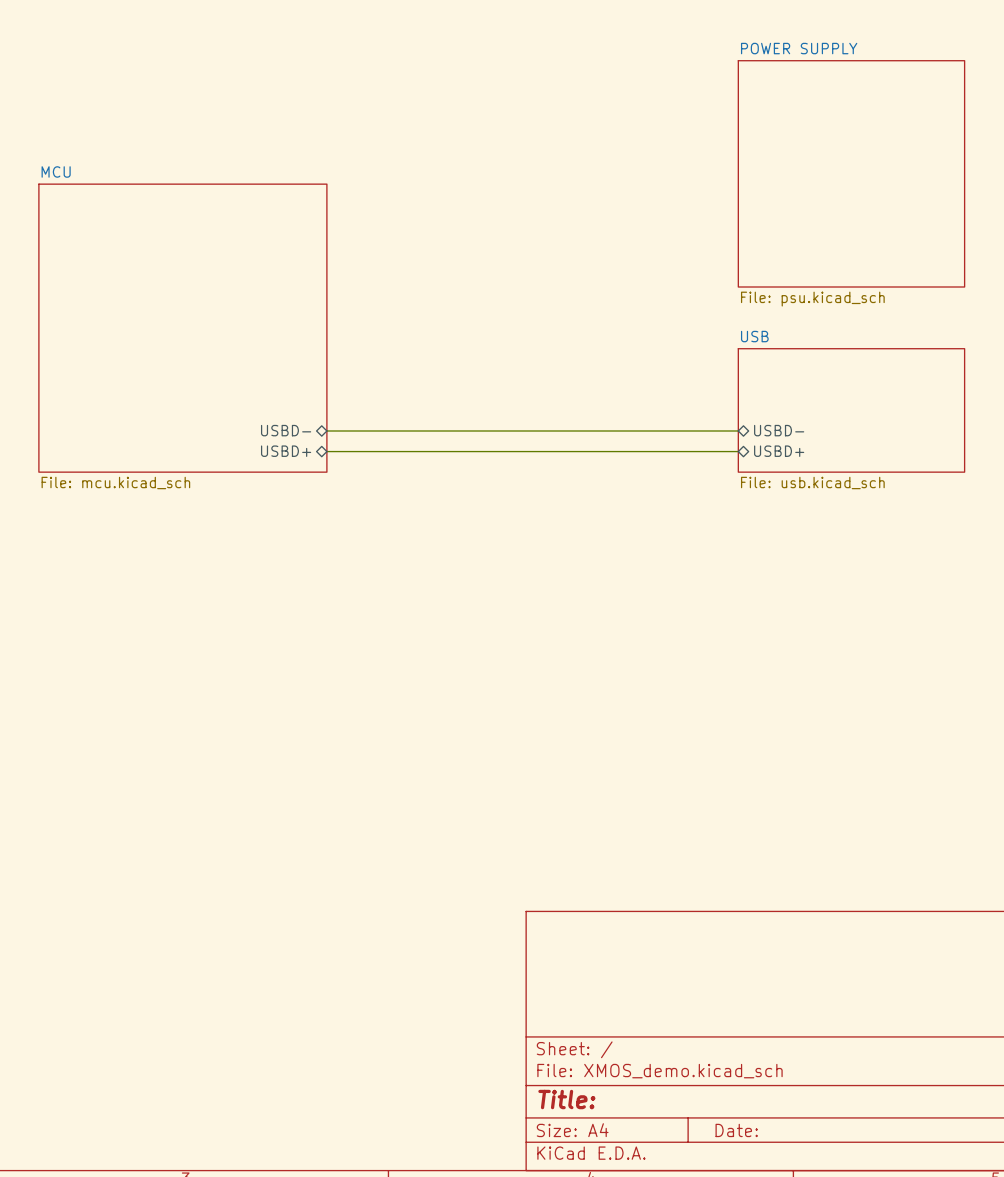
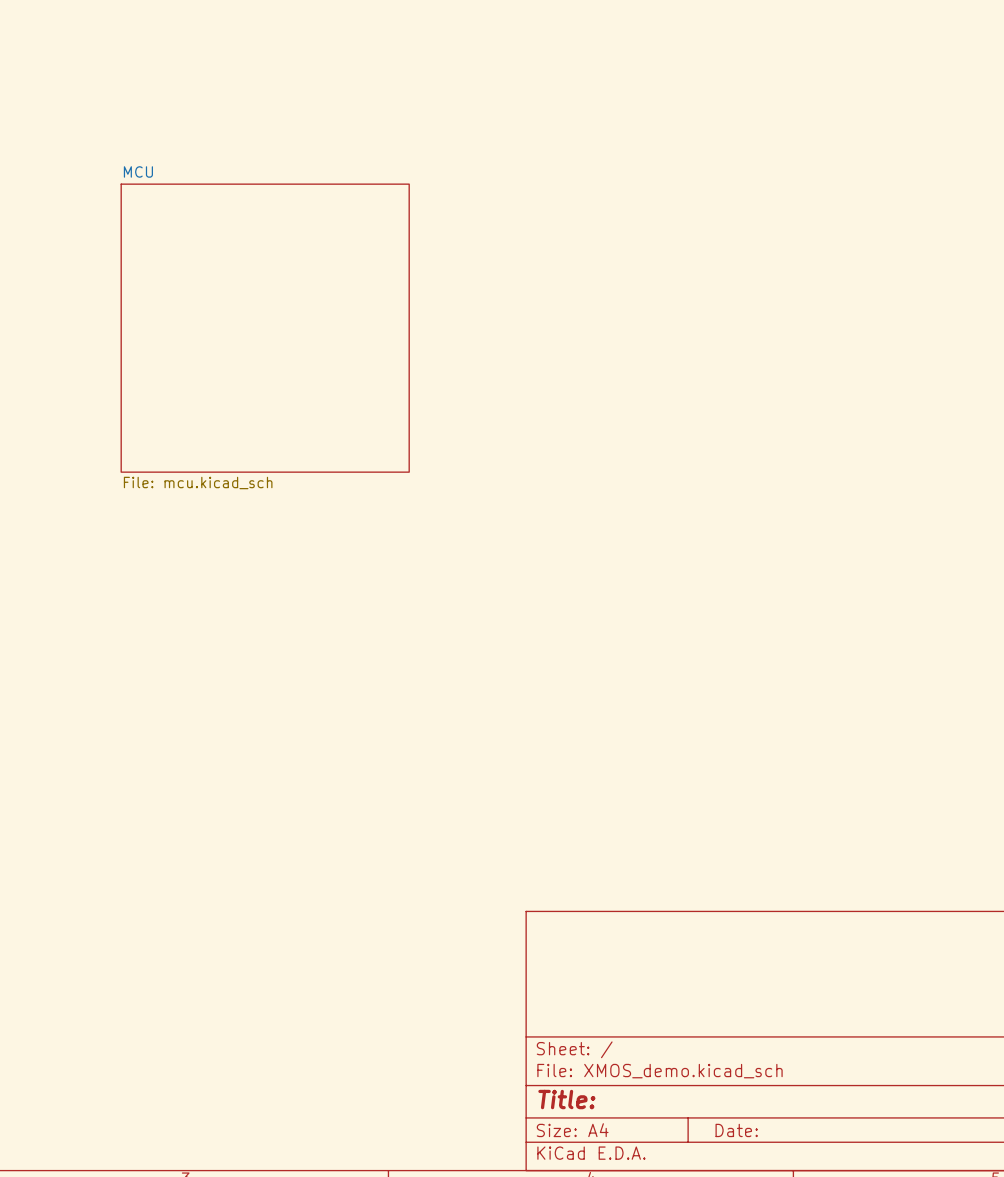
sheet POWER SUPPLY: File: psu.kicad_sch (851, 173) -> none
sheet MCU position: (182, 328) -> (265, 328)
sheet USB: File: usb.kicad_sch (851, 410) -> none
sheet pin: USBD- (286, 430) -> none
wire: (326, 430) (738, 430) -> none
sheet pin: USBD- (779, 430) -> none
sheet pin: USBD+ (286, 451) -> none
wire: (326, 451) (738, 451) -> none
sheet pin: USBD+ (779, 451) -> none

